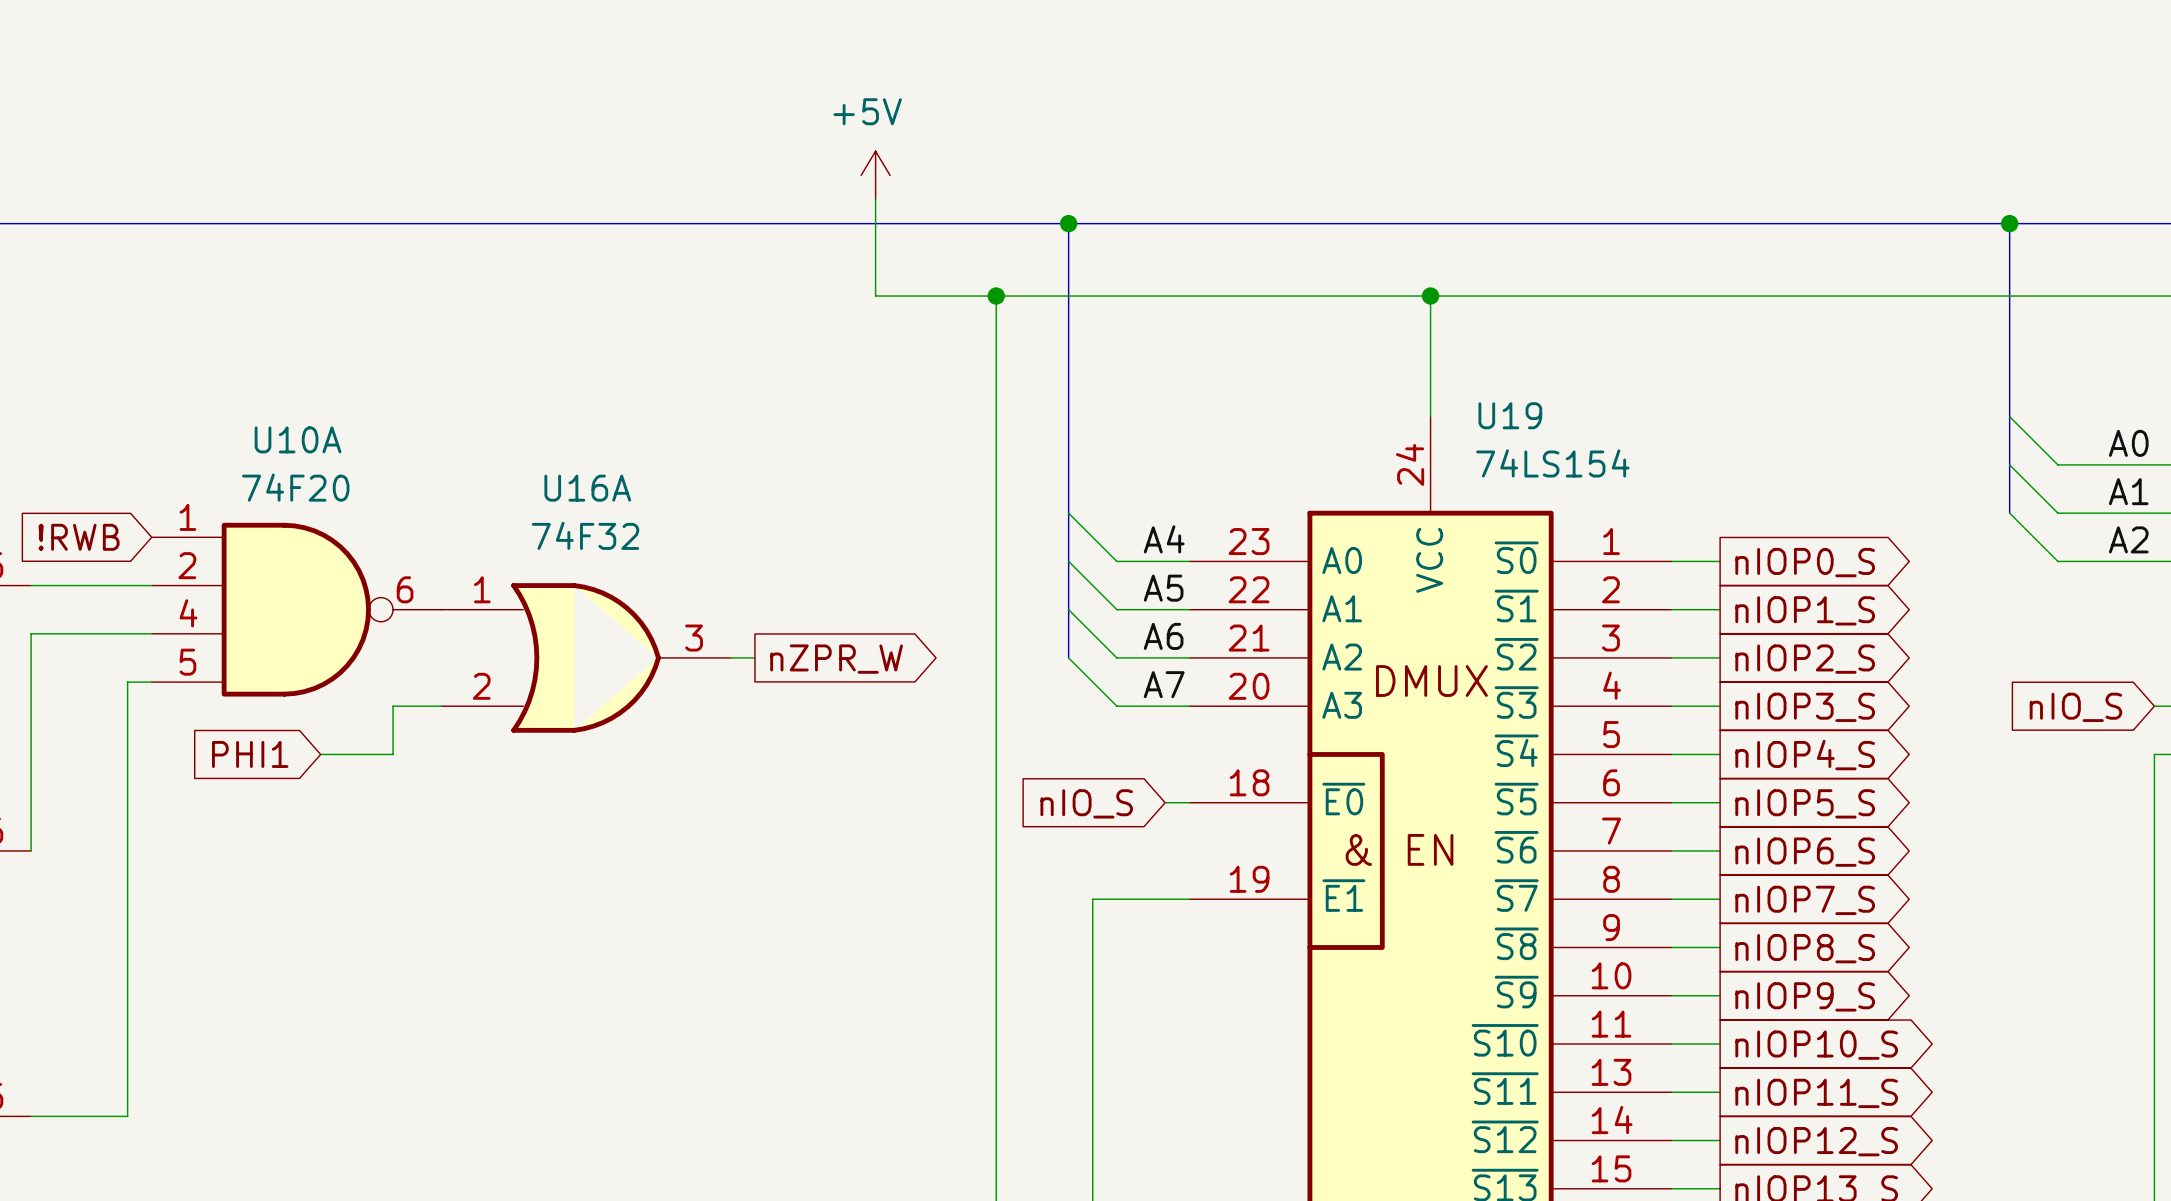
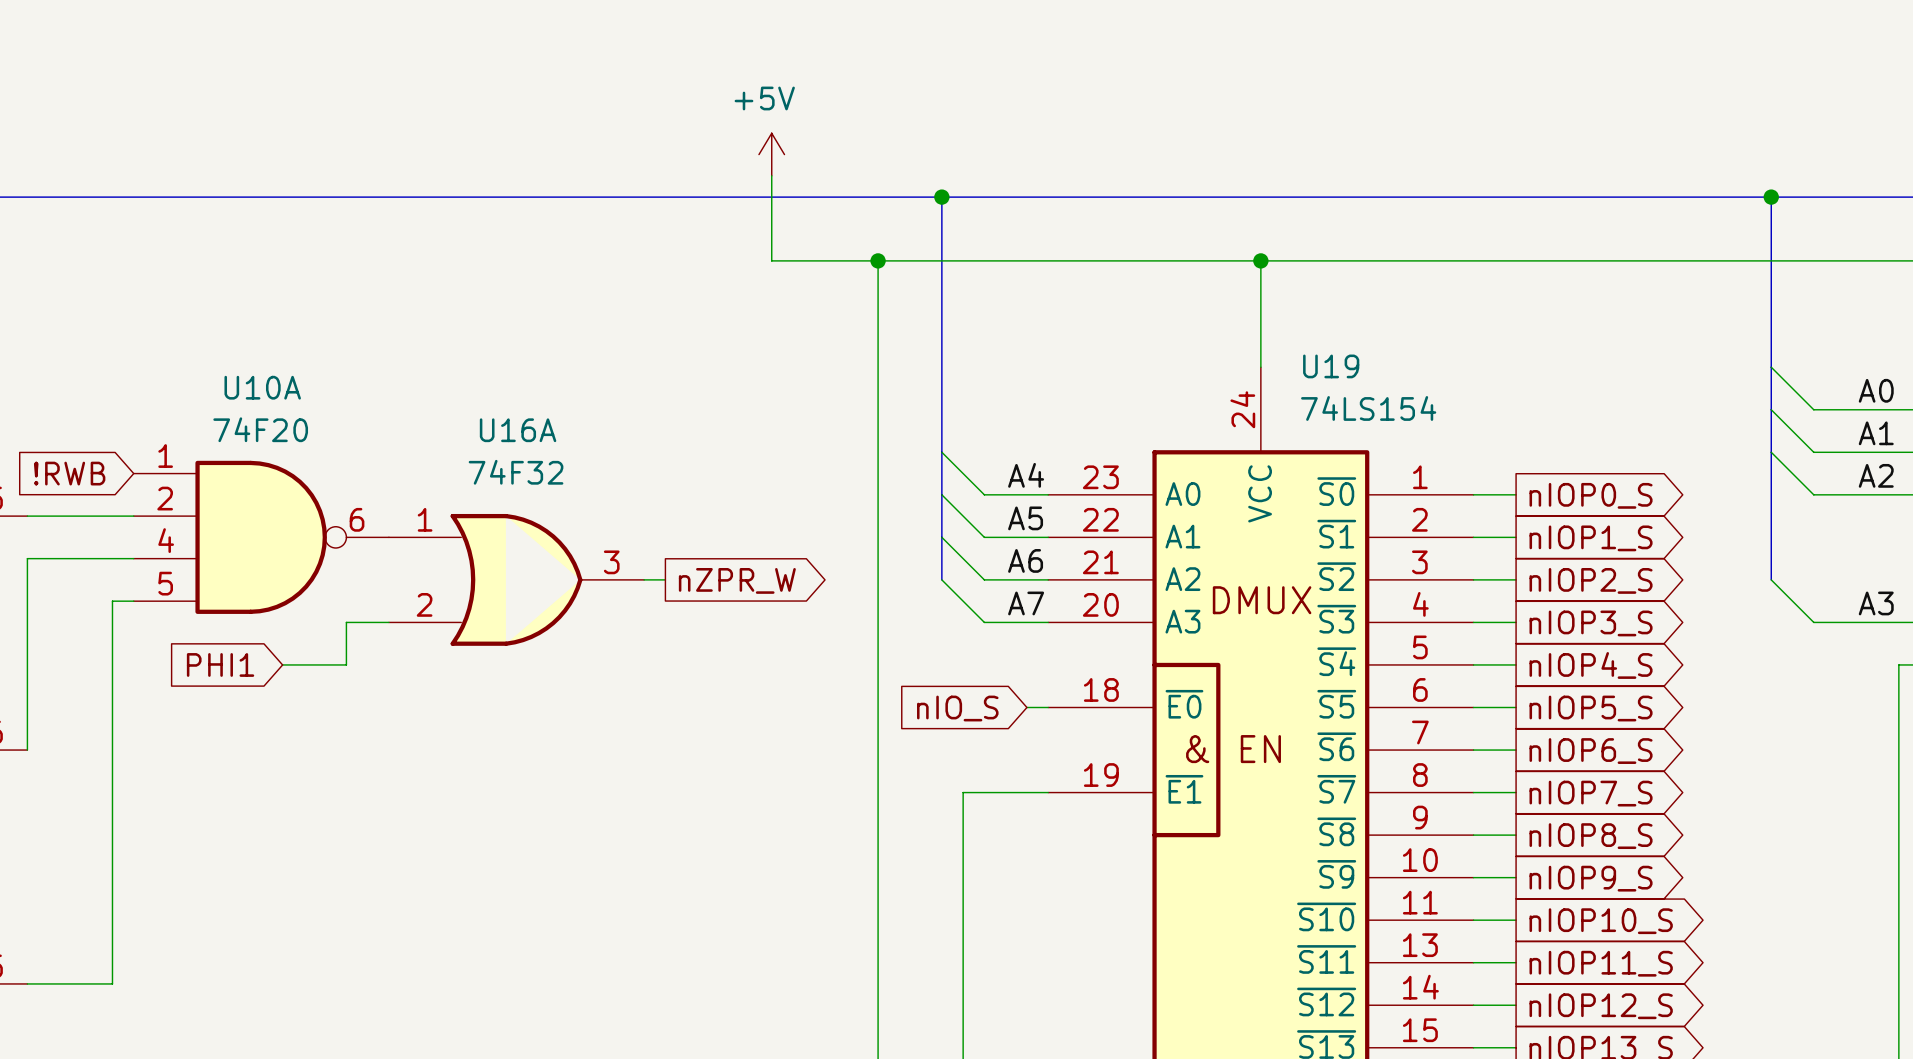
bus: none -> (1771, 452) (1771, 579)
wire: none -> (1771, 579) (1813, 622) (1898, 622)
label: none -> A3 (1876, 603)
global label: nIO_S (2075, 707) -> none

